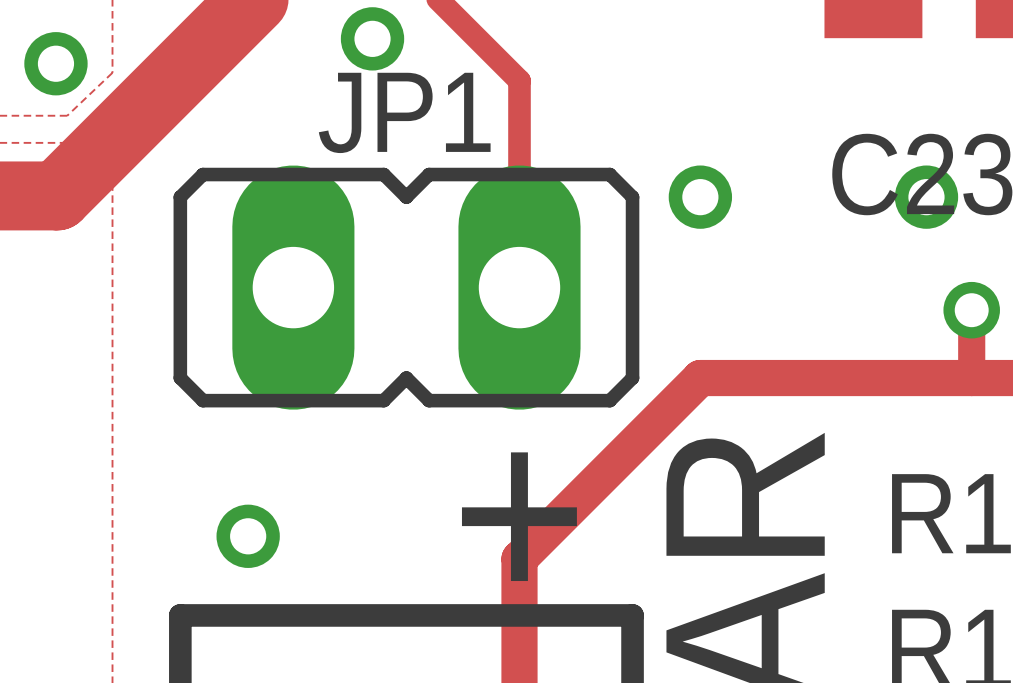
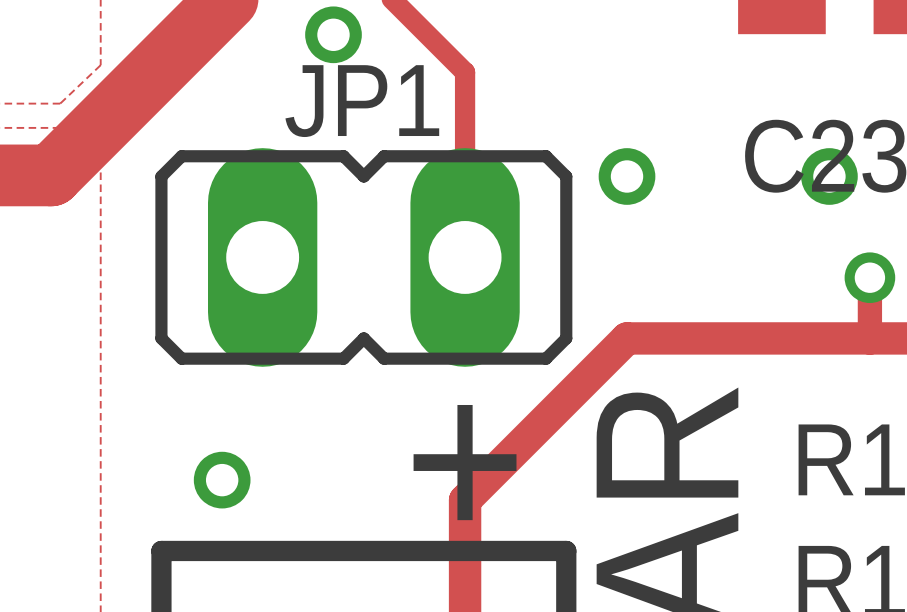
via: (55, 63) -> none

